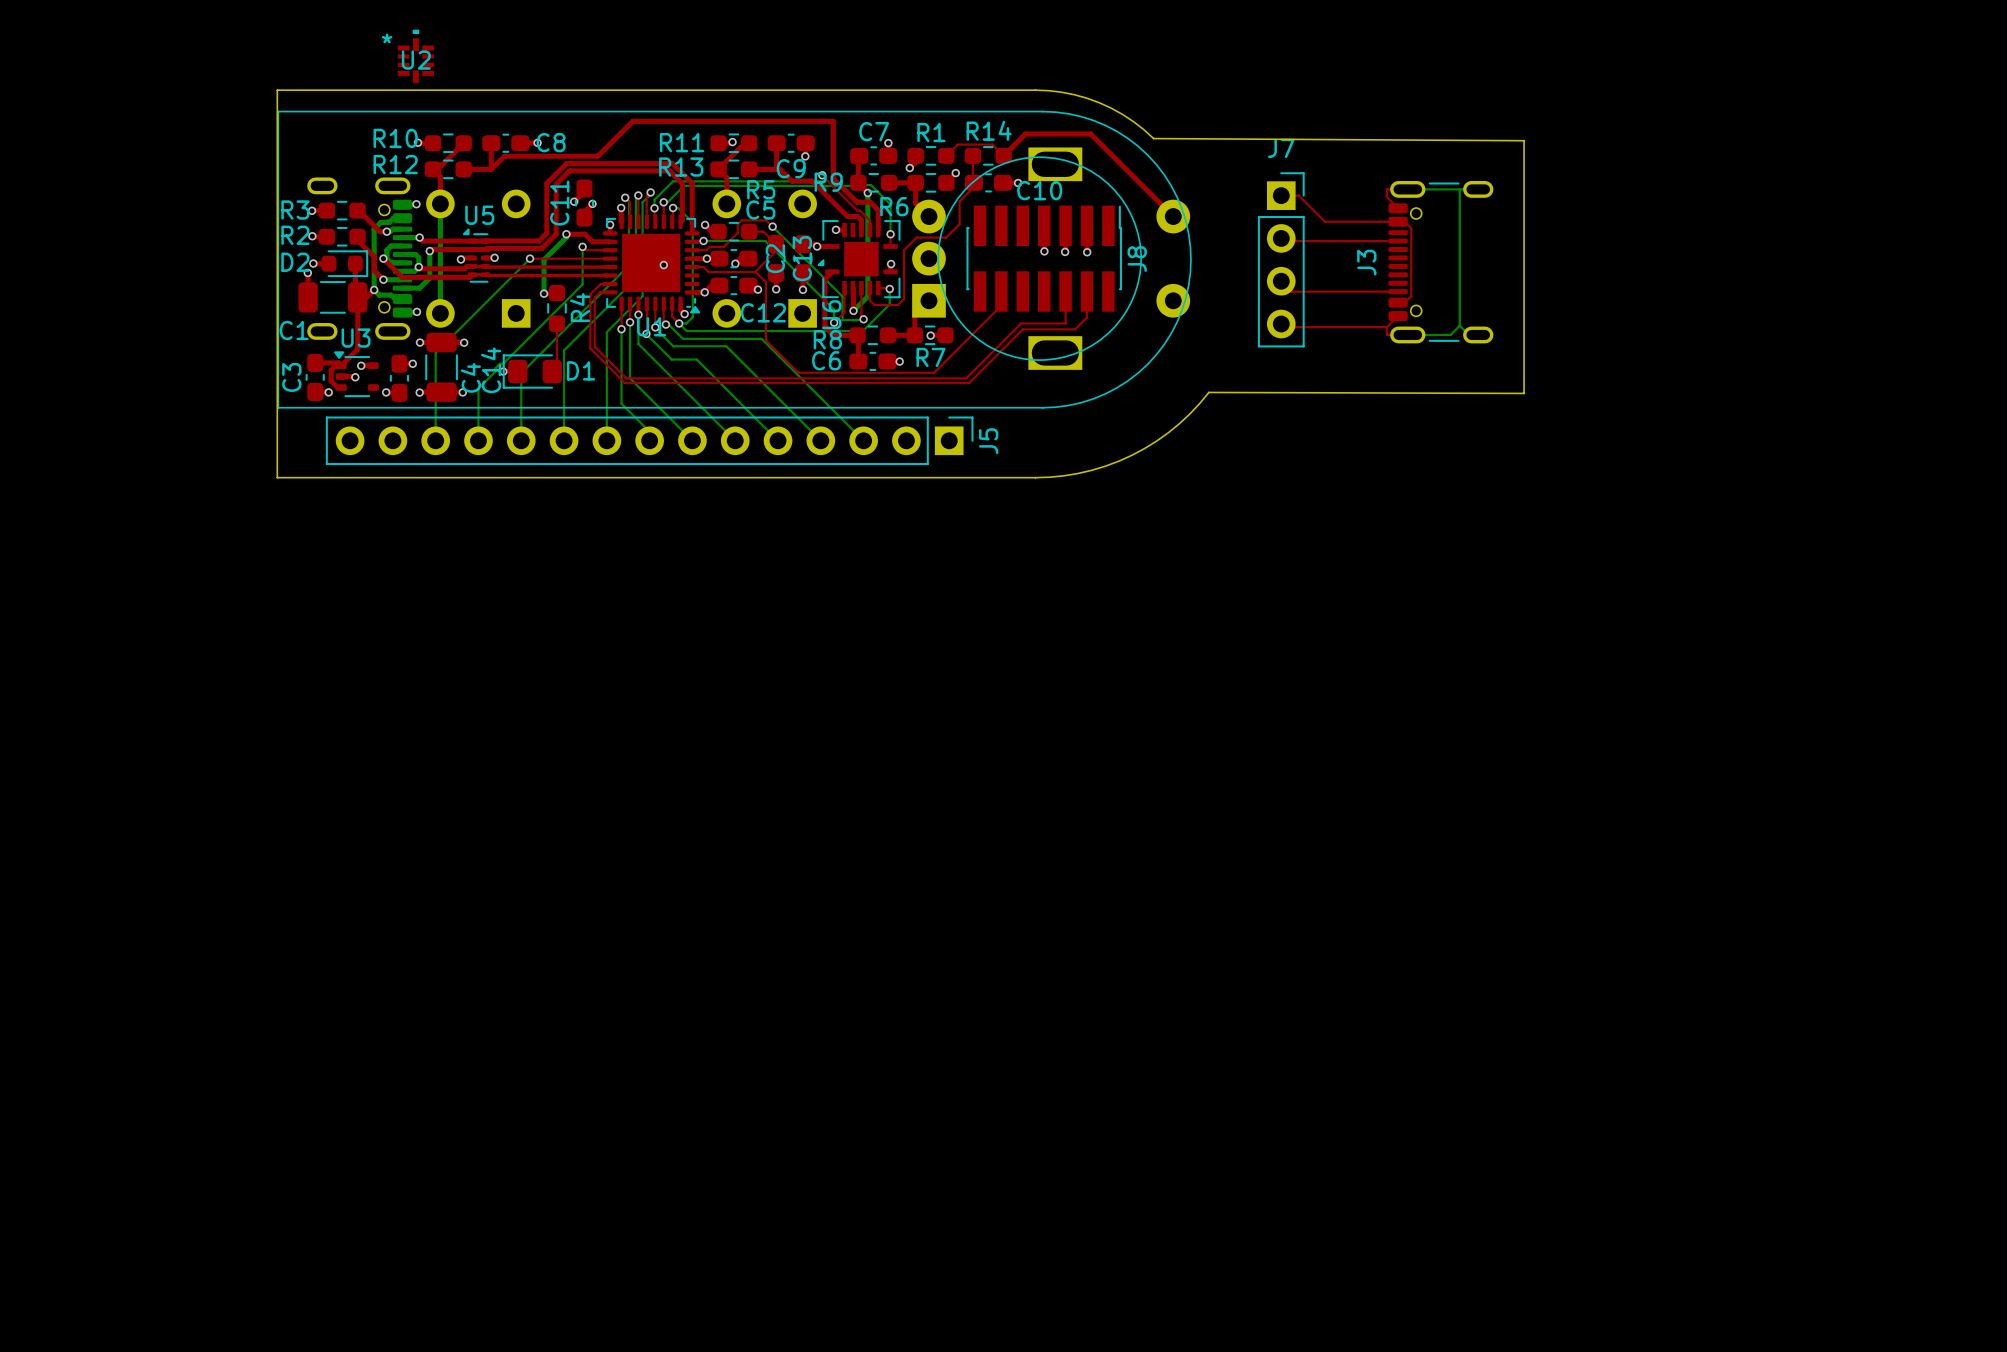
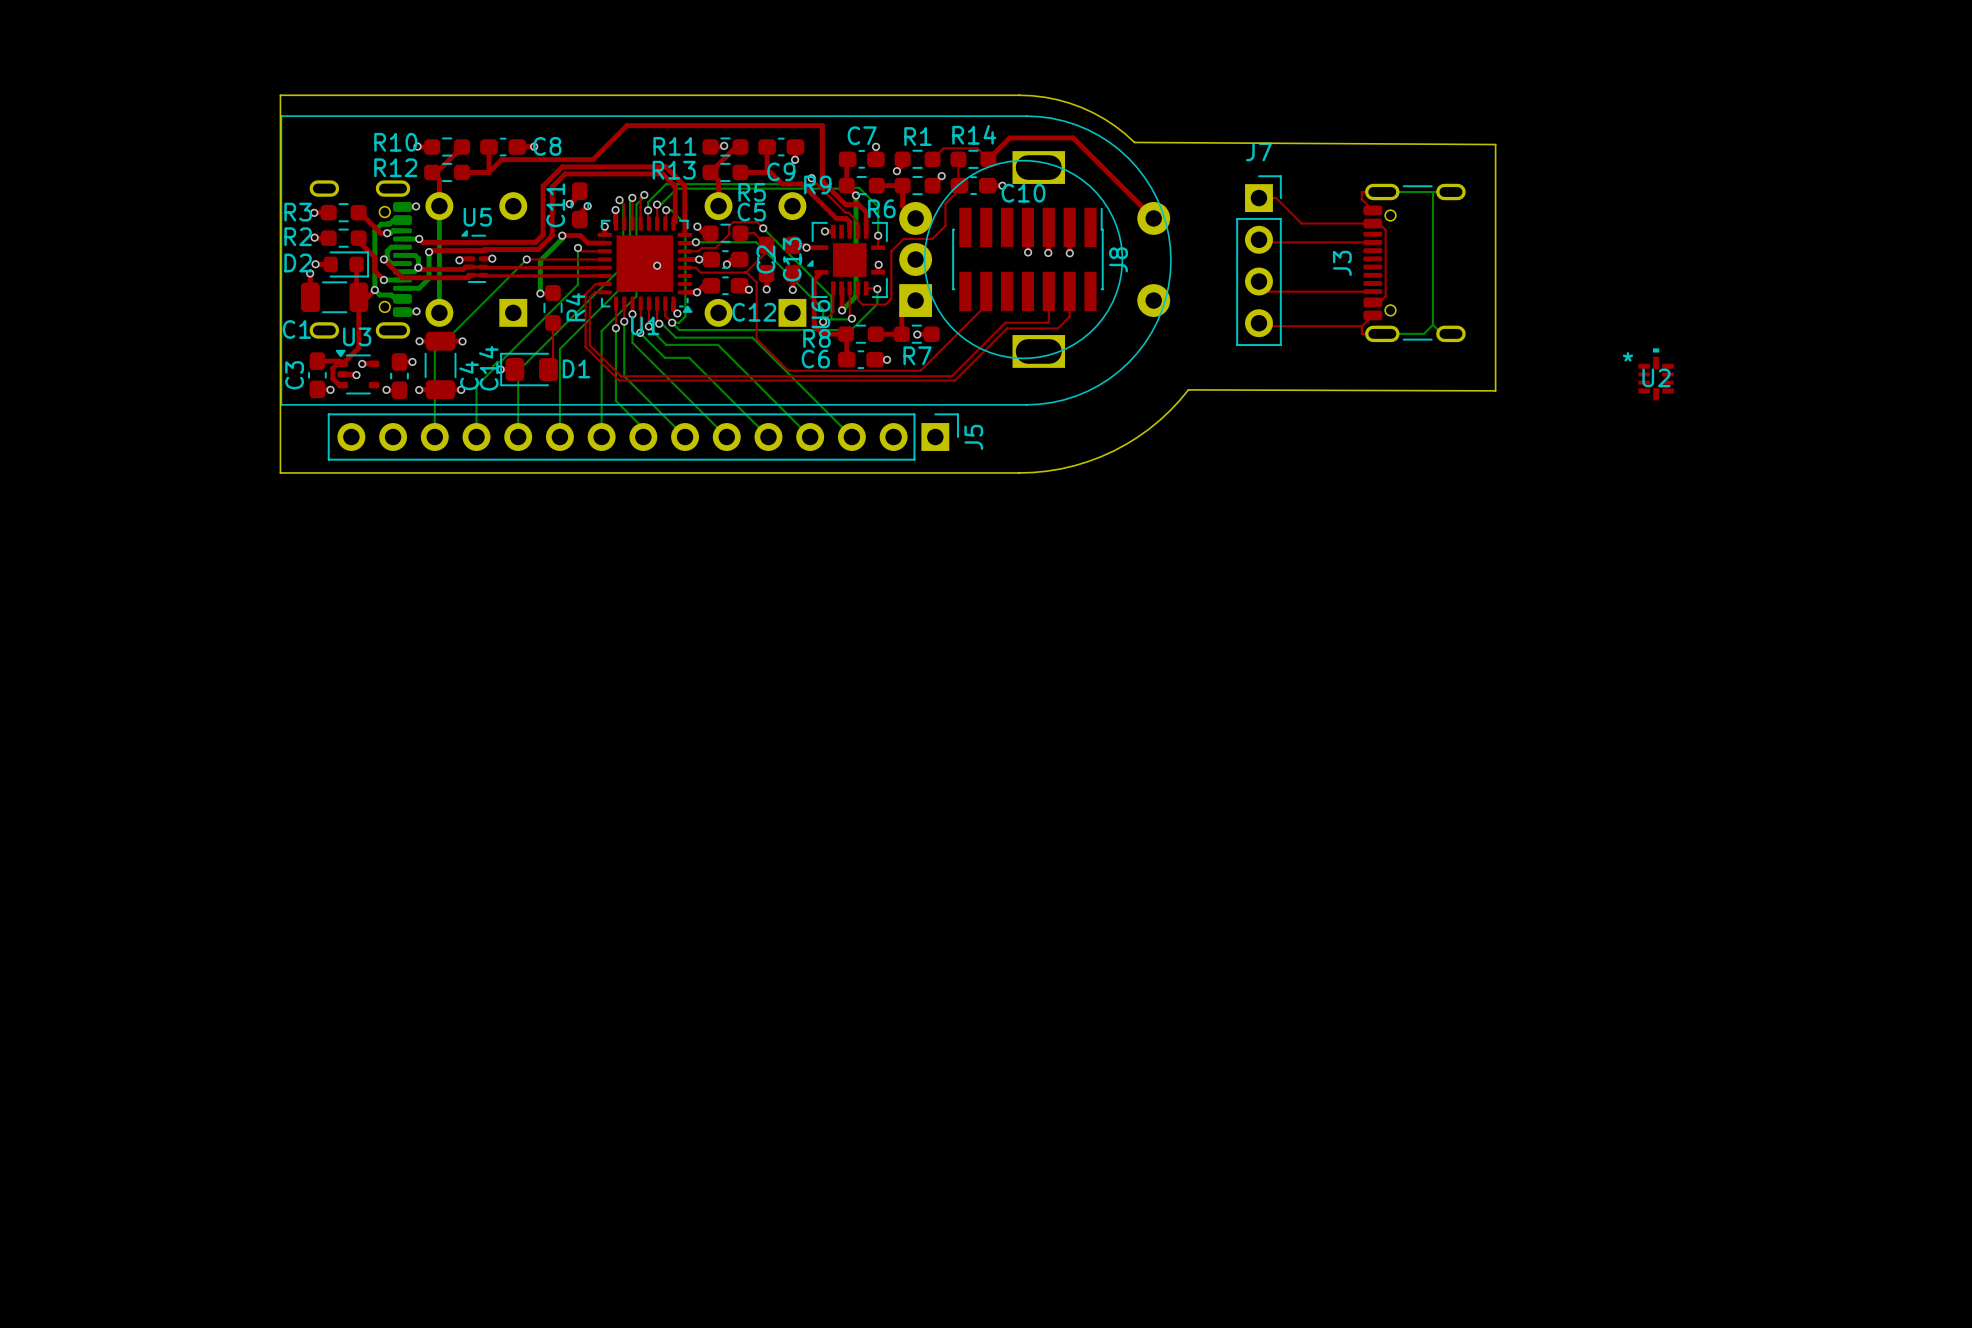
U2 position: (415, 56) -> (1656, 374)

